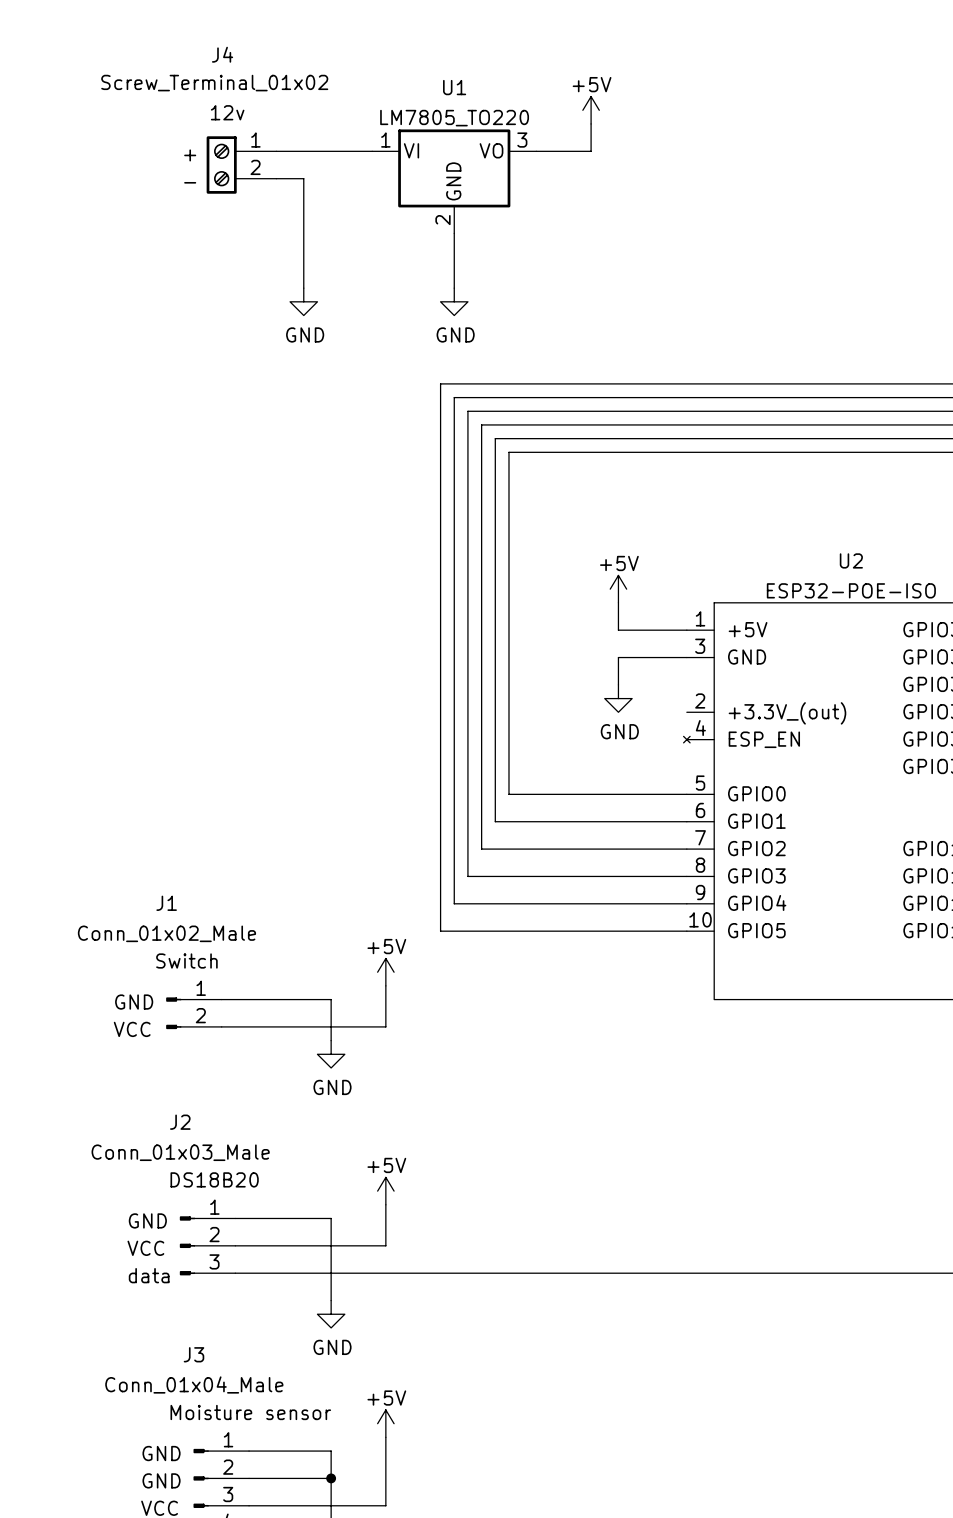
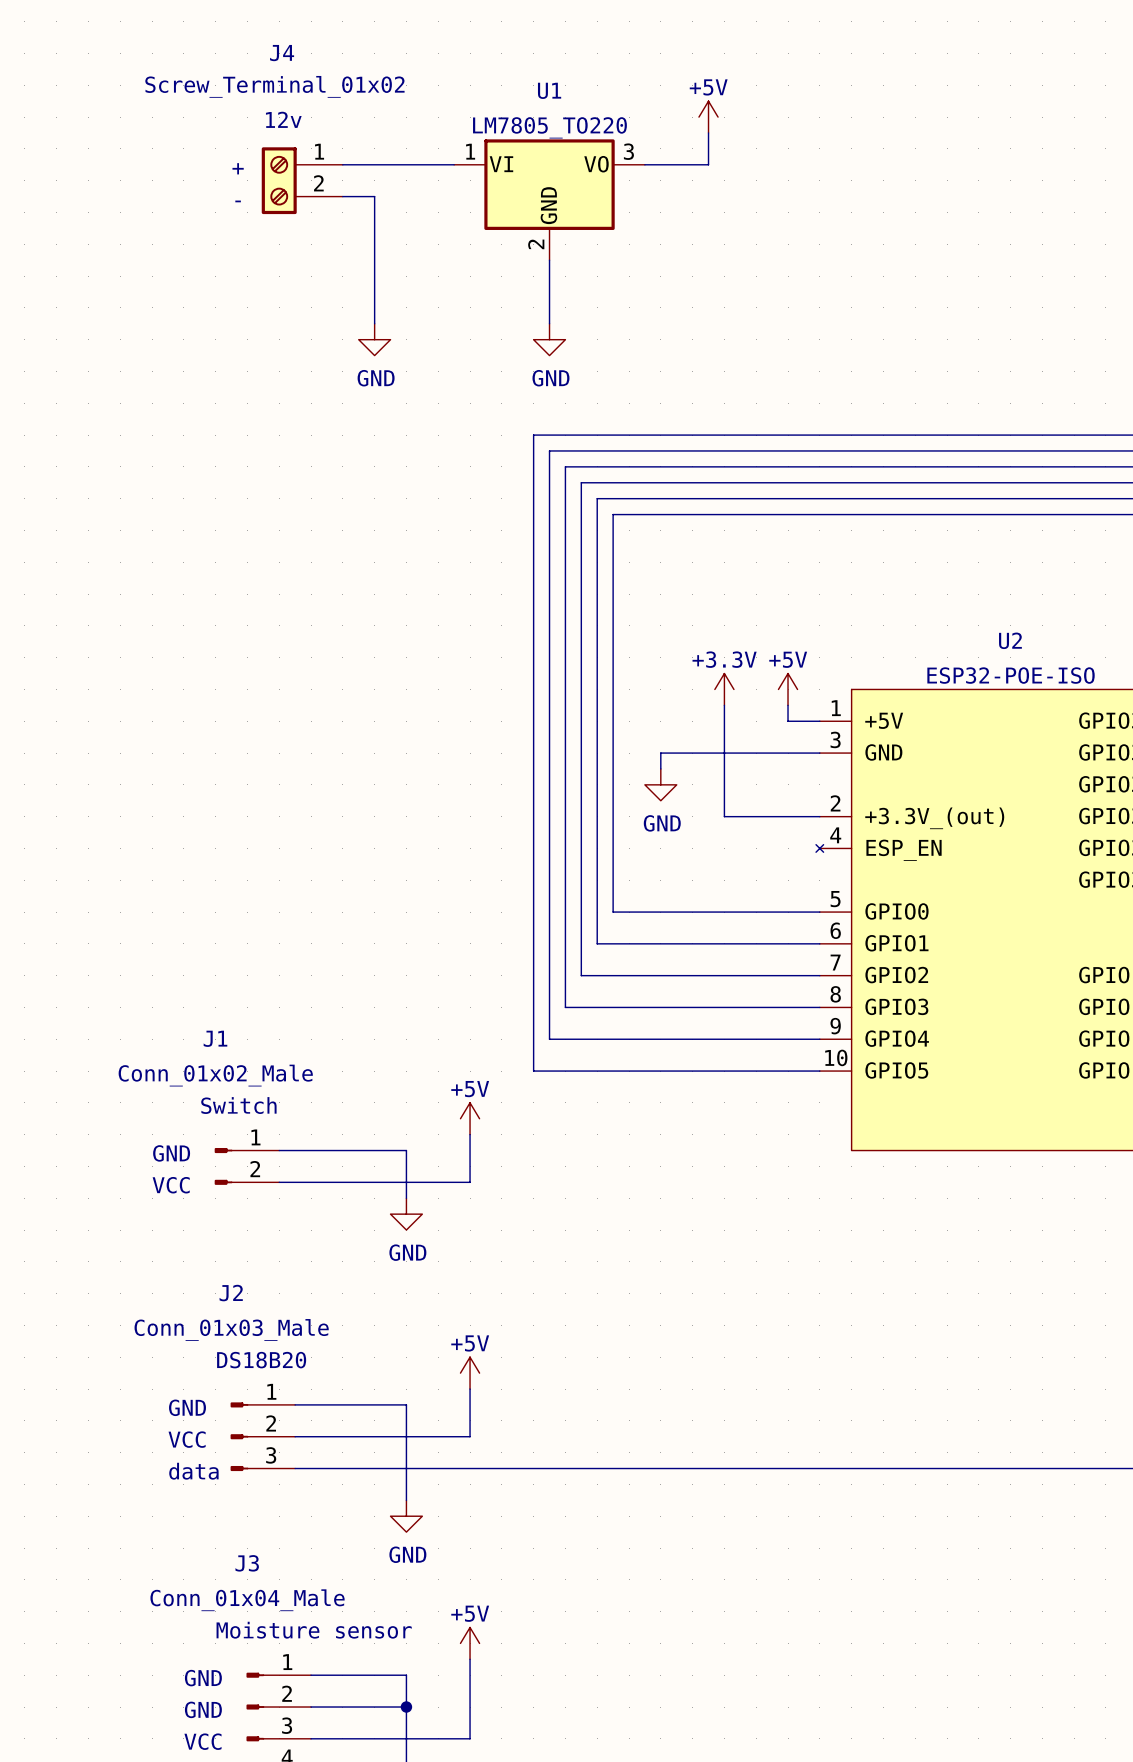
power symbol position: +5V (618, 589) -> +5V (788, 689)
power symbol: none -> +3.3V (724, 689)
wire: (618, 602) (618, 630) (659, 630) -> (788, 705) (788, 721)
wire: none -> (724, 705) (724, 816) (819, 816)
wire: (618, 657) (618, 684) -> (740, 753) (660, 753) (660, 768)
power symbol position: GND (618, 698) -> GND (660, 784)

